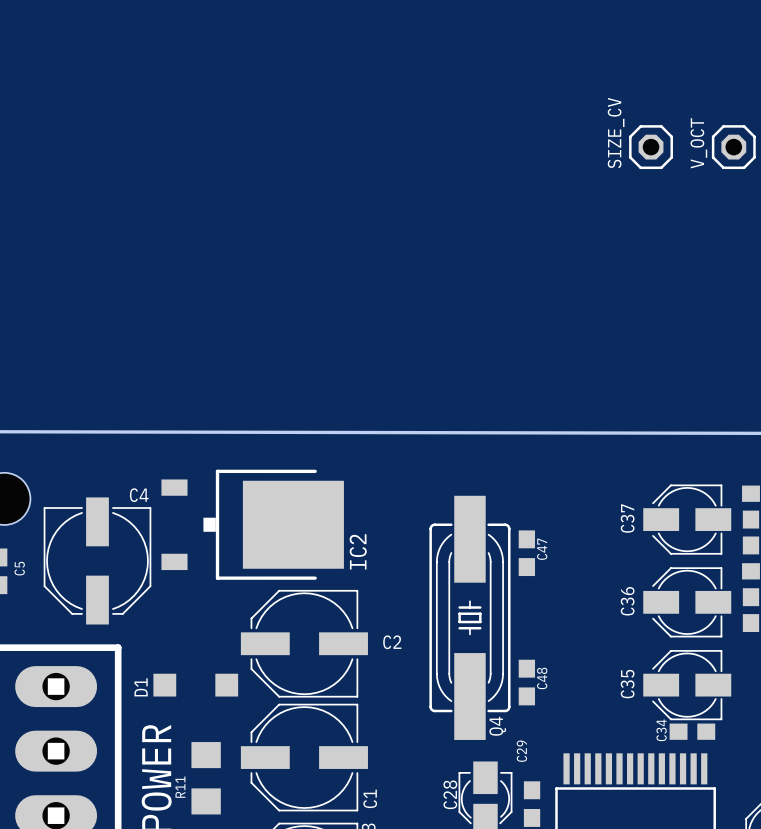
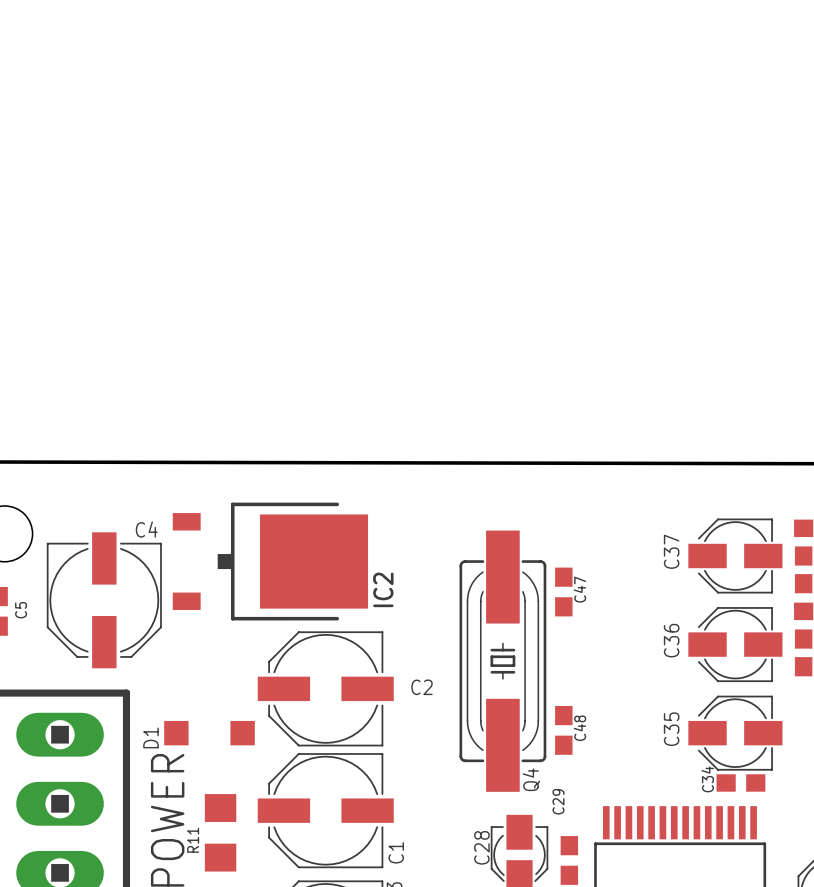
SIZE_CV: (651, 147) -> none
V_OCT: (733, 147) -> none

